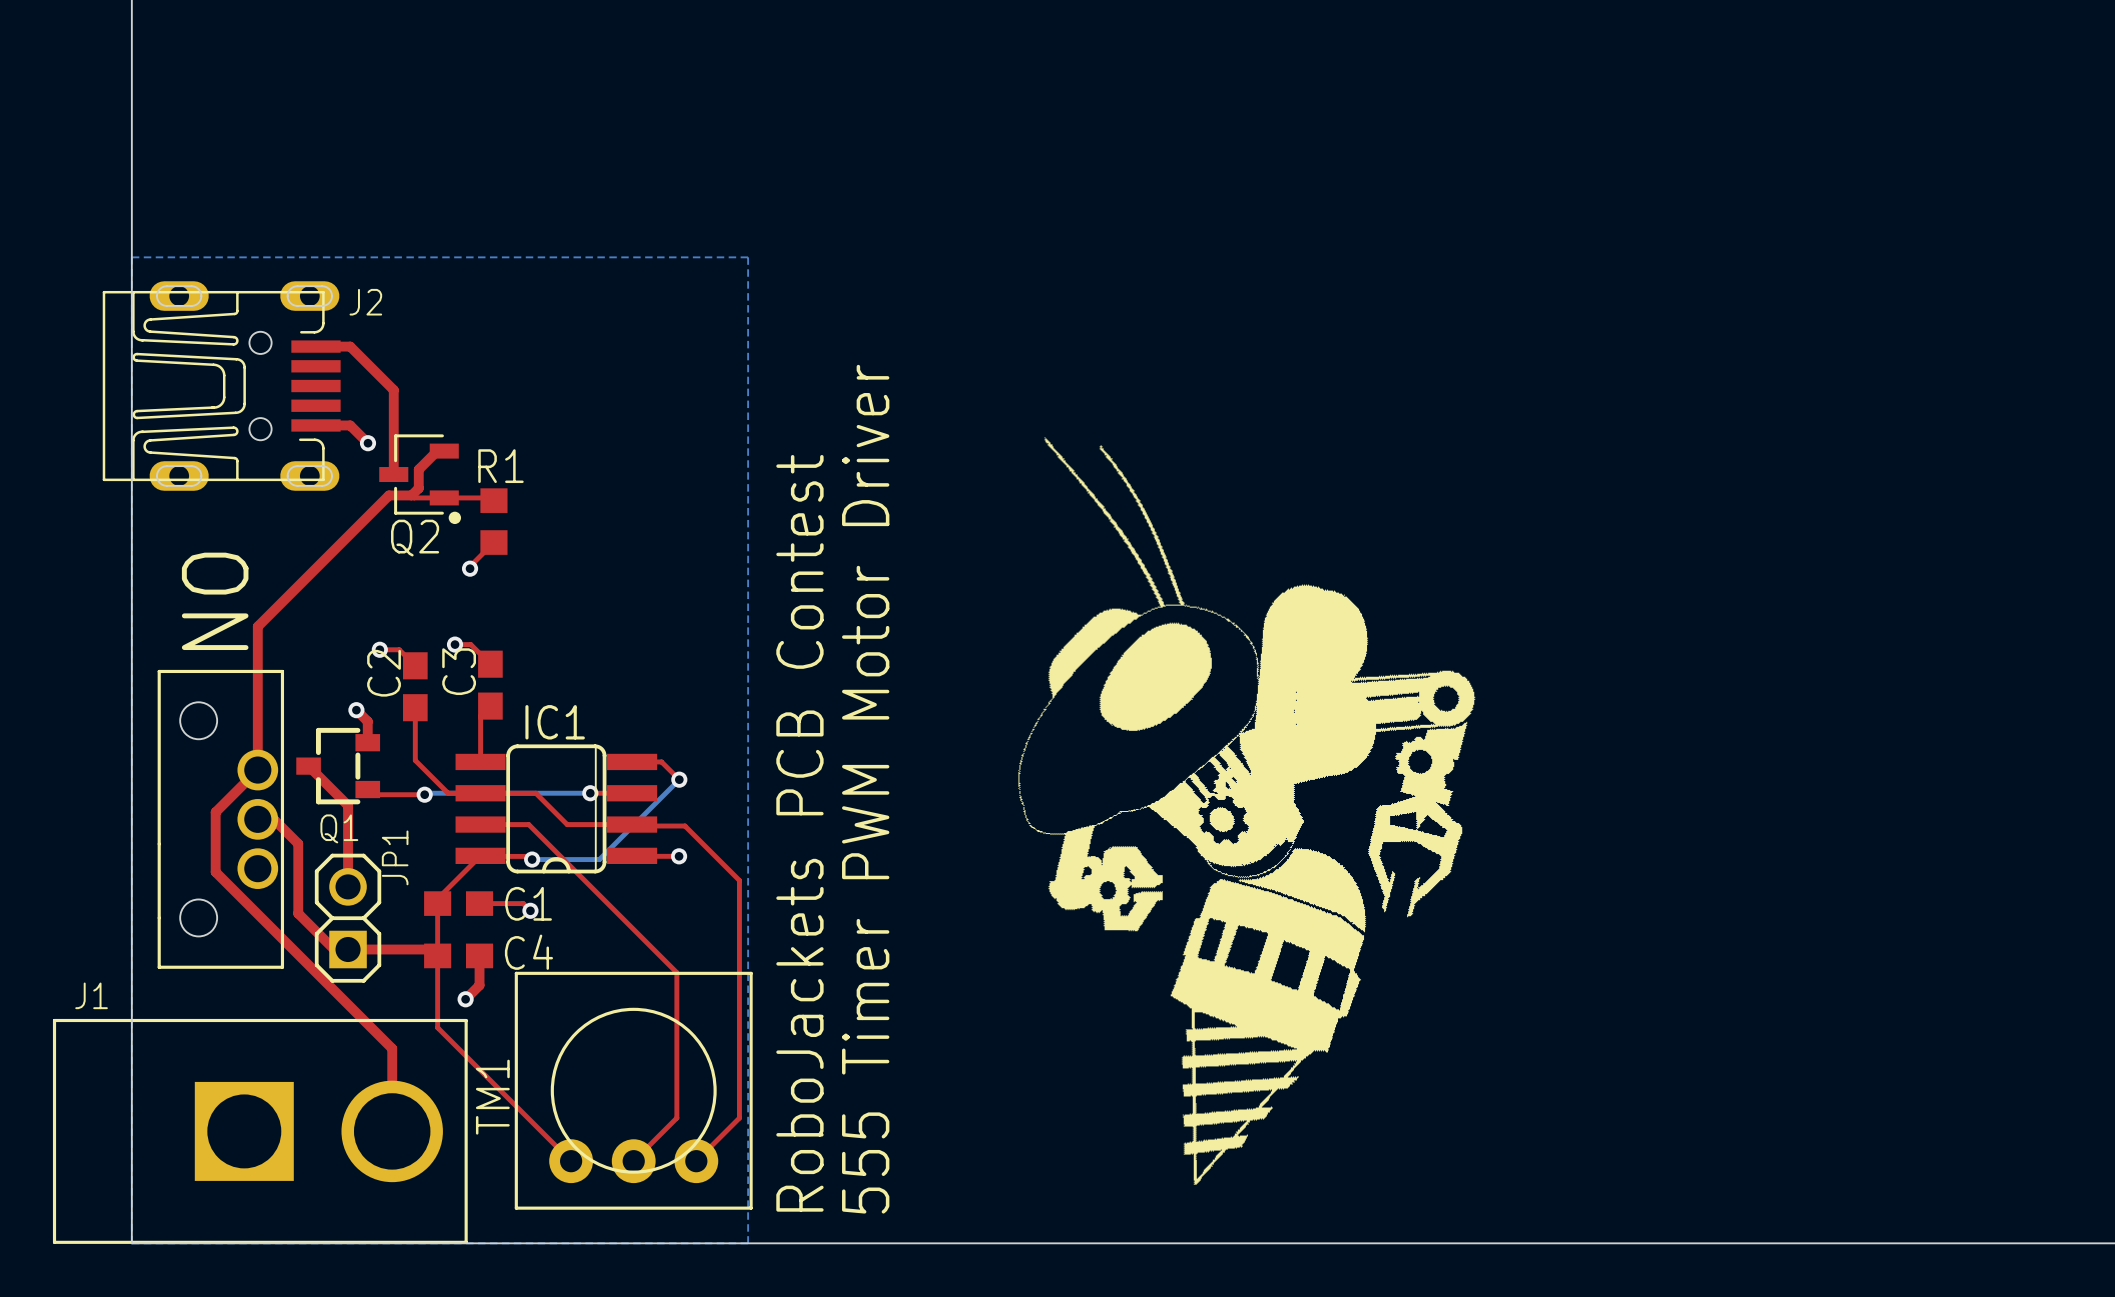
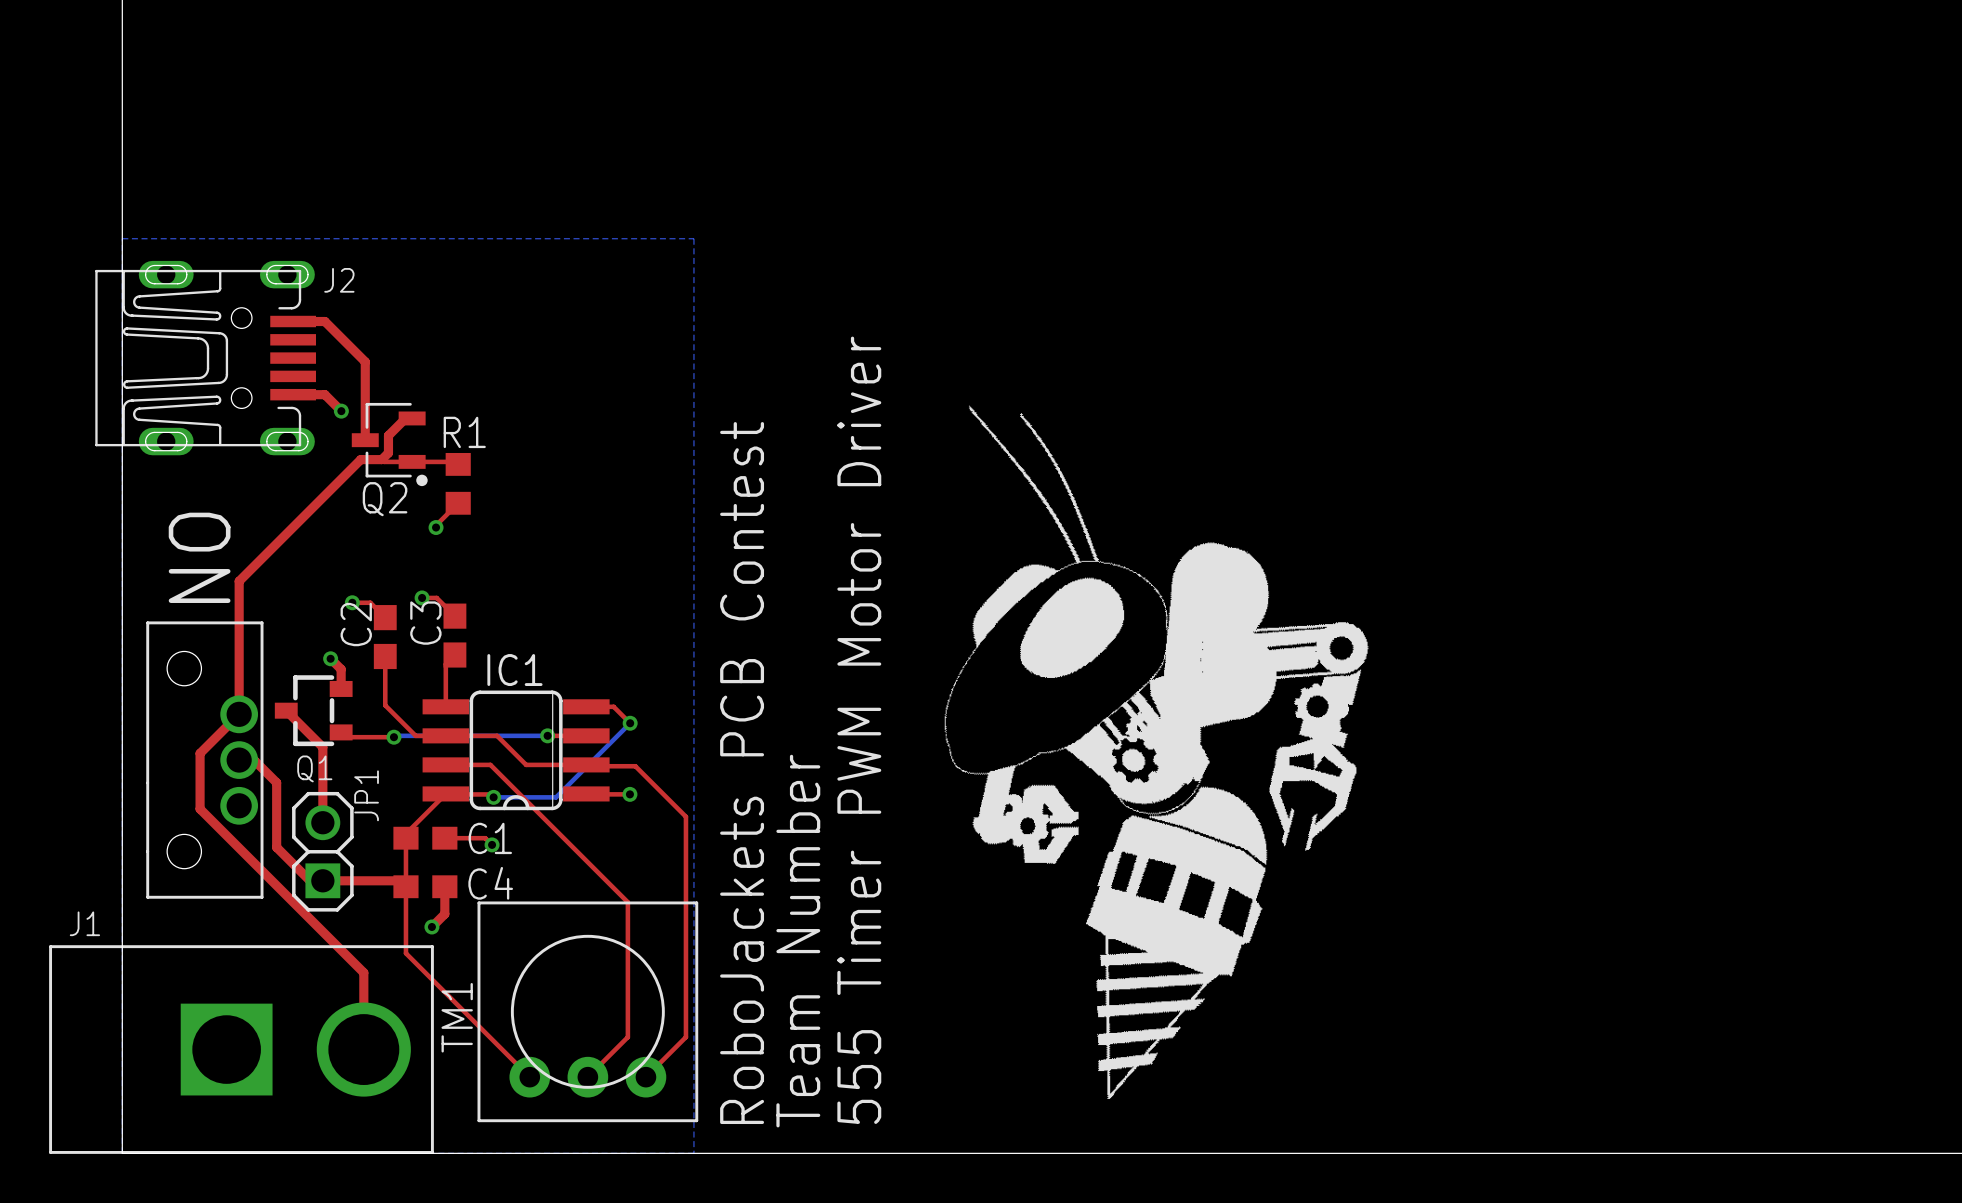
text position: 555 Timer PWM Motor Driver (865, 789) -> 555 Timer PWM Motor Driver (859, 730)
text: none -> Team Number (798, 941)

